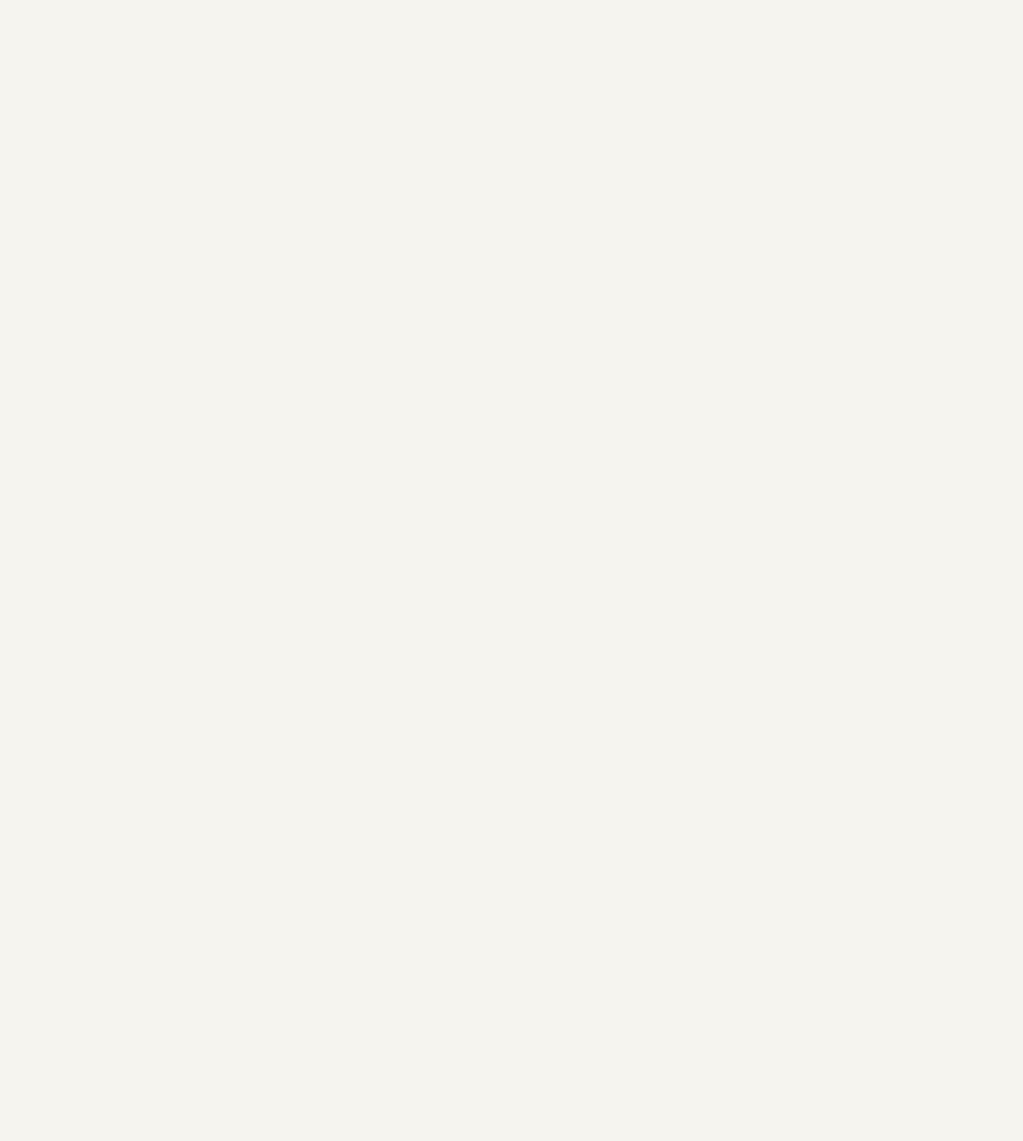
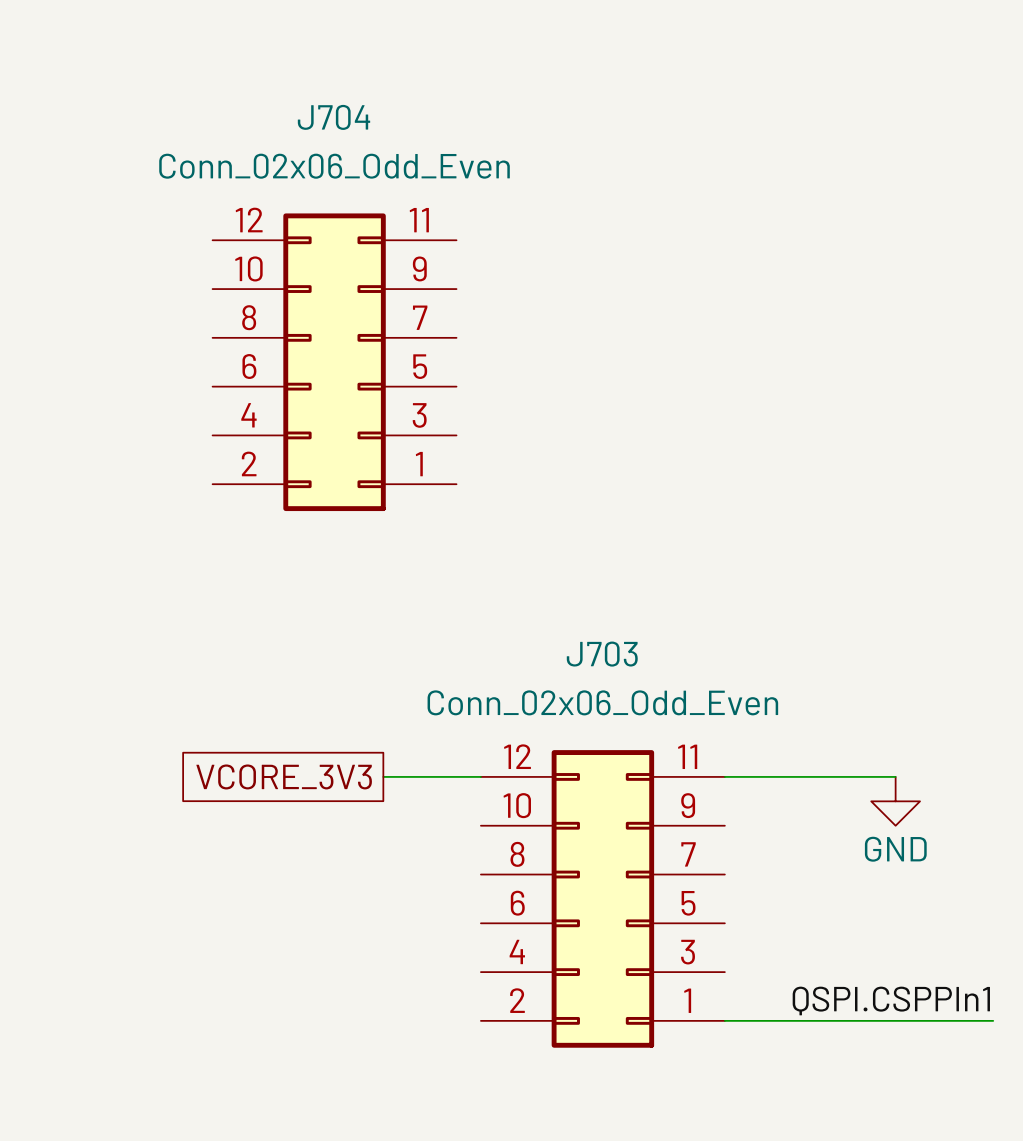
J704: none -> Conn_02x06_Odd_Even (334, 362)
global label: none -> VCORE_3V3 (284, 776)
wire: none -> (383, 776) (480, 776)
wire: none -> (724, 776) (895, 776)
power symbol: none -> GND (895, 801)
J703: none -> Conn_02x06_Odd_Even (602, 898)
label: none -> QSPI.CSPPIn1 (891, 1000)
wire: none -> (724, 1020) (993, 1020)

